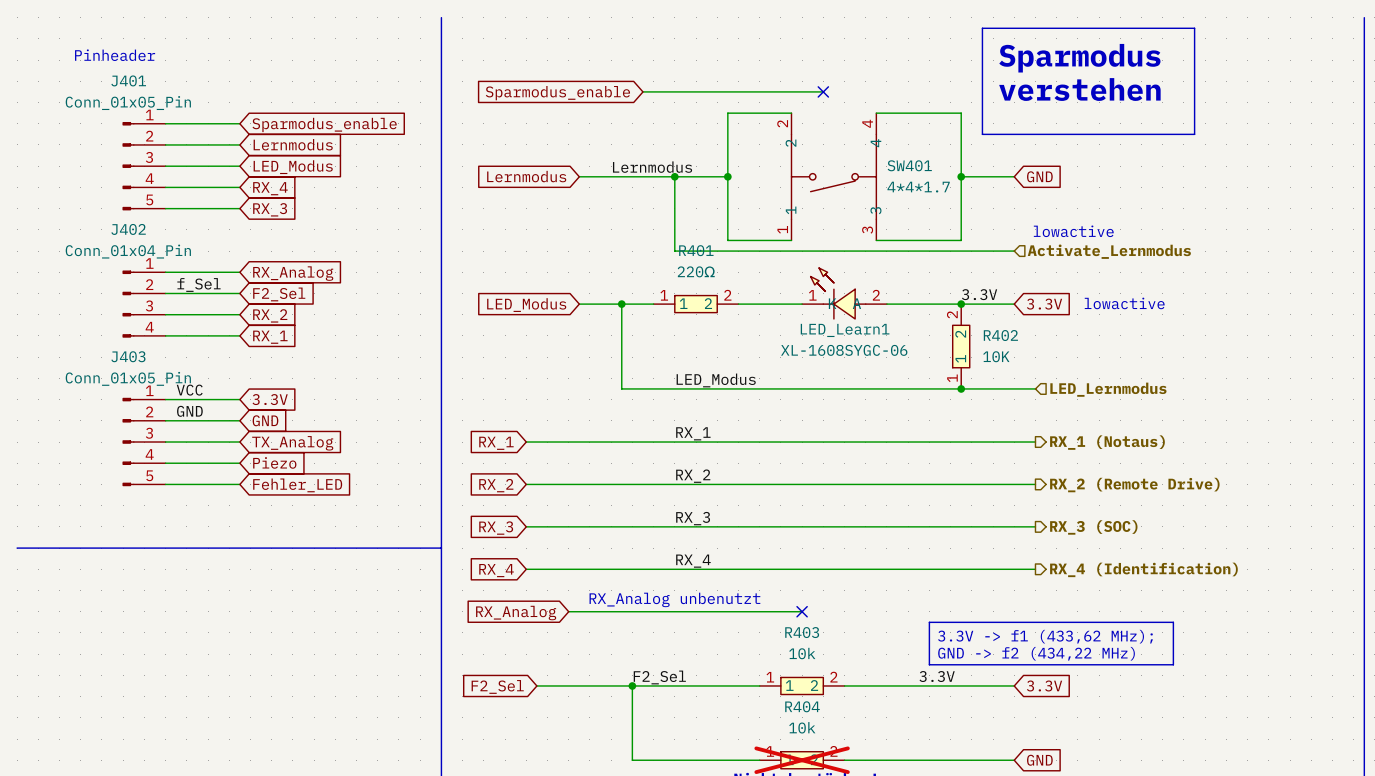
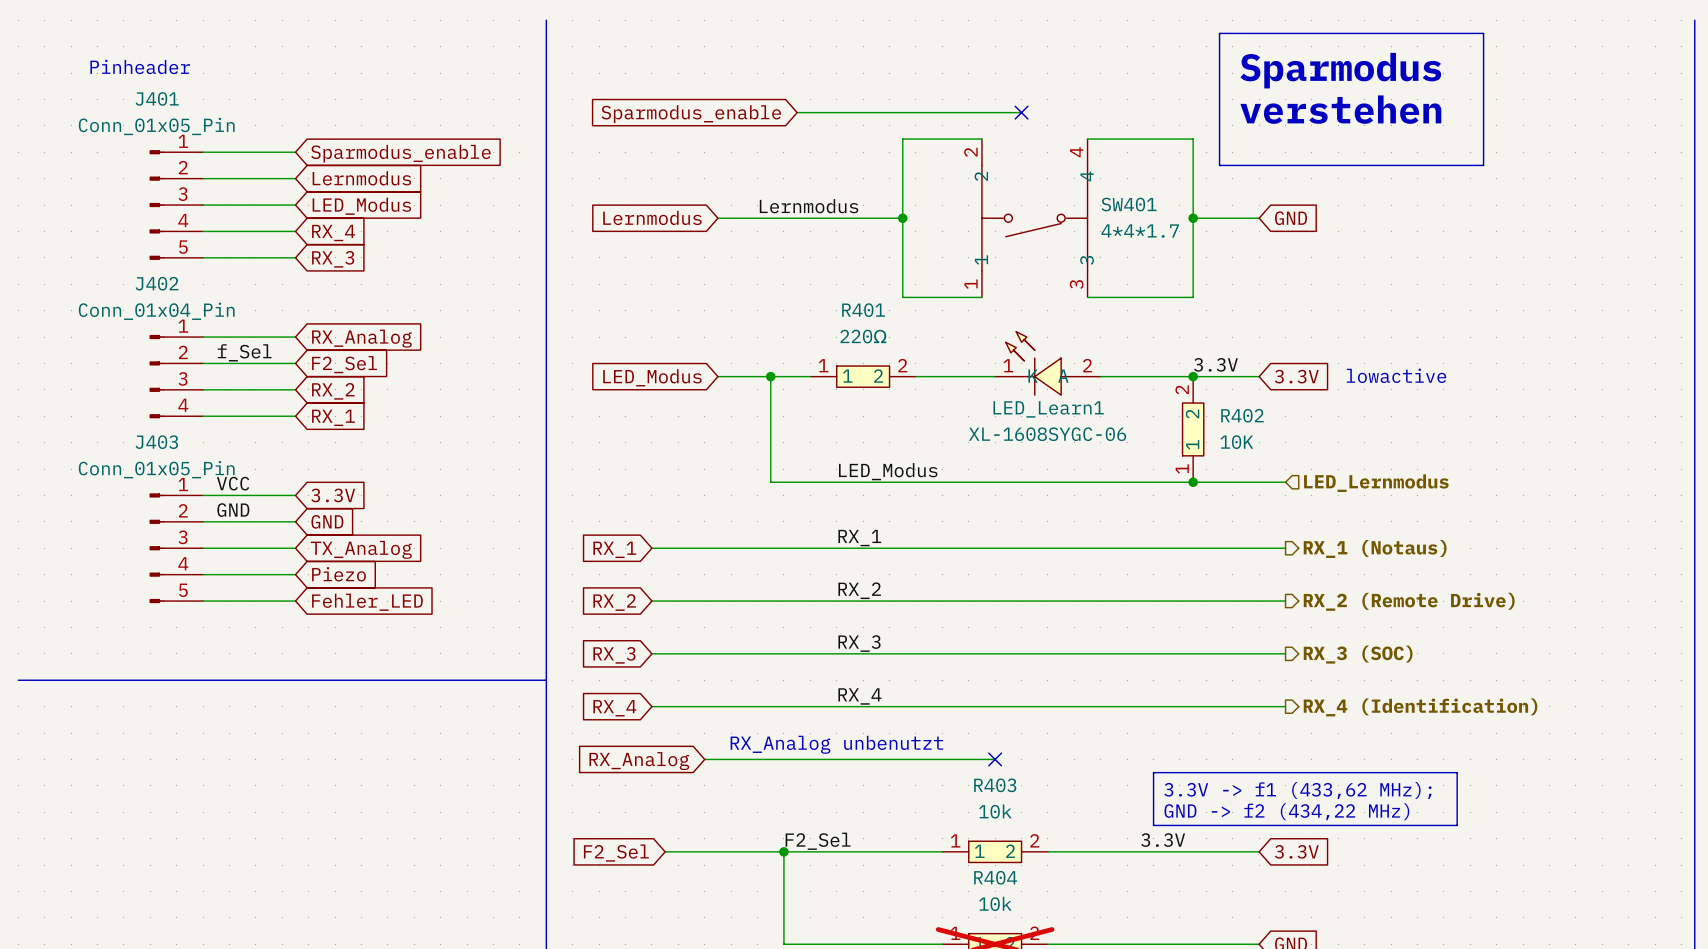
wire: (674, 176) (674, 251) (1014, 251) -> none
junction: (674, 176) -> none
text: lowactive (1073, 231) -> none
hierarchical label: Activate_Lernmodus (1109, 251) -> none

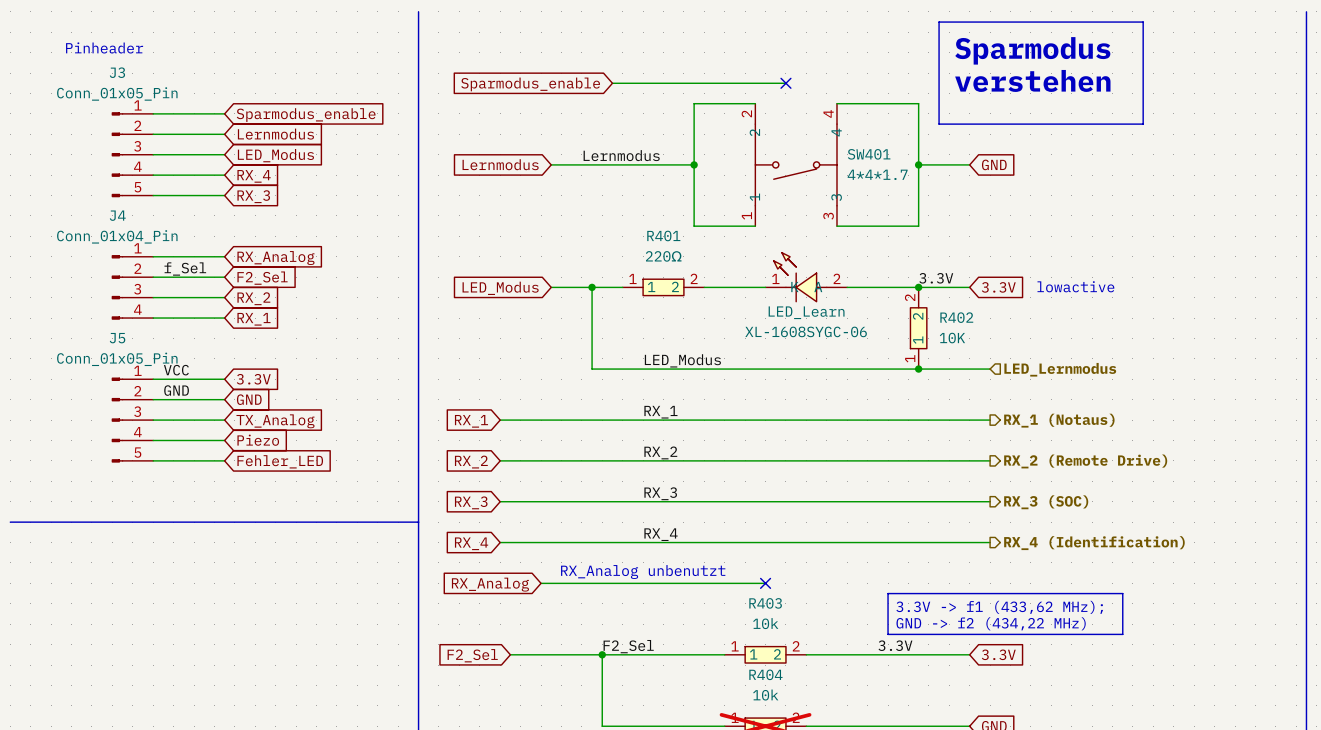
J401 name: J401 (157, 98) -> J3 (117, 72)
J402 name: J402 (157, 283) -> J4 (117, 215)
LED_Learn1 name: LED_Learn1 (1048, 409) -> LED_Learn (806, 312)
J403 name: J403 (156, 442) -> J5 (117, 338)

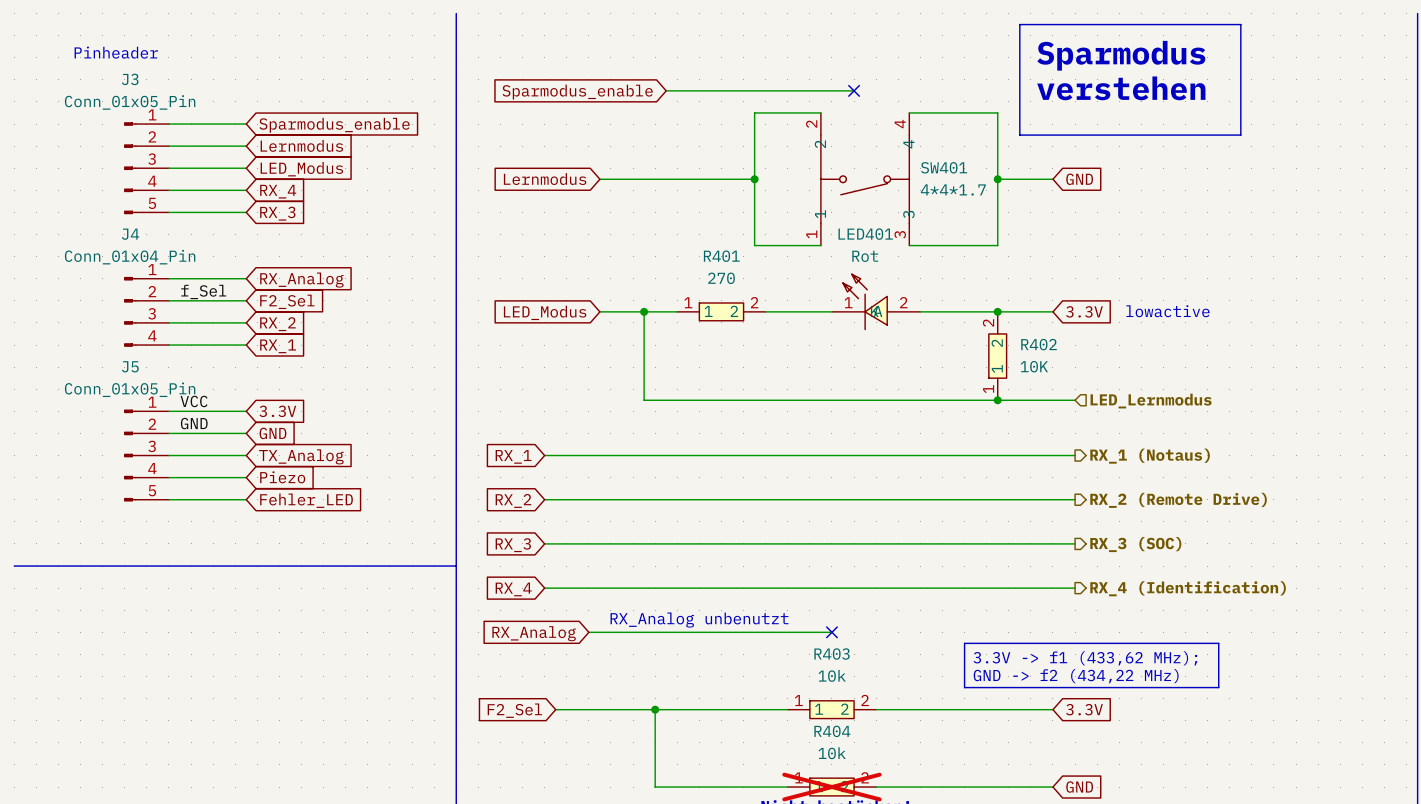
label: Lernmodus (621, 155) -> none
R401 value: 220Ω (663, 256) -> 270 (721, 278)
LED_Learn: XL-1608SYGC-06 (806, 277) -> none
LED401: none -> Rot (876, 301)
label: 3.3V (936, 278) -> none
label: LED_Modus (682, 360) -> none
label: RX_1 (660, 412) -> none
label: RX_2 (660, 452) -> none
label: RX_3 (660, 493) -> none
label: RX_4 (661, 534) -> none
label: 3.3V (895, 645) -> none
label: F2_Sel (628, 646) -> none

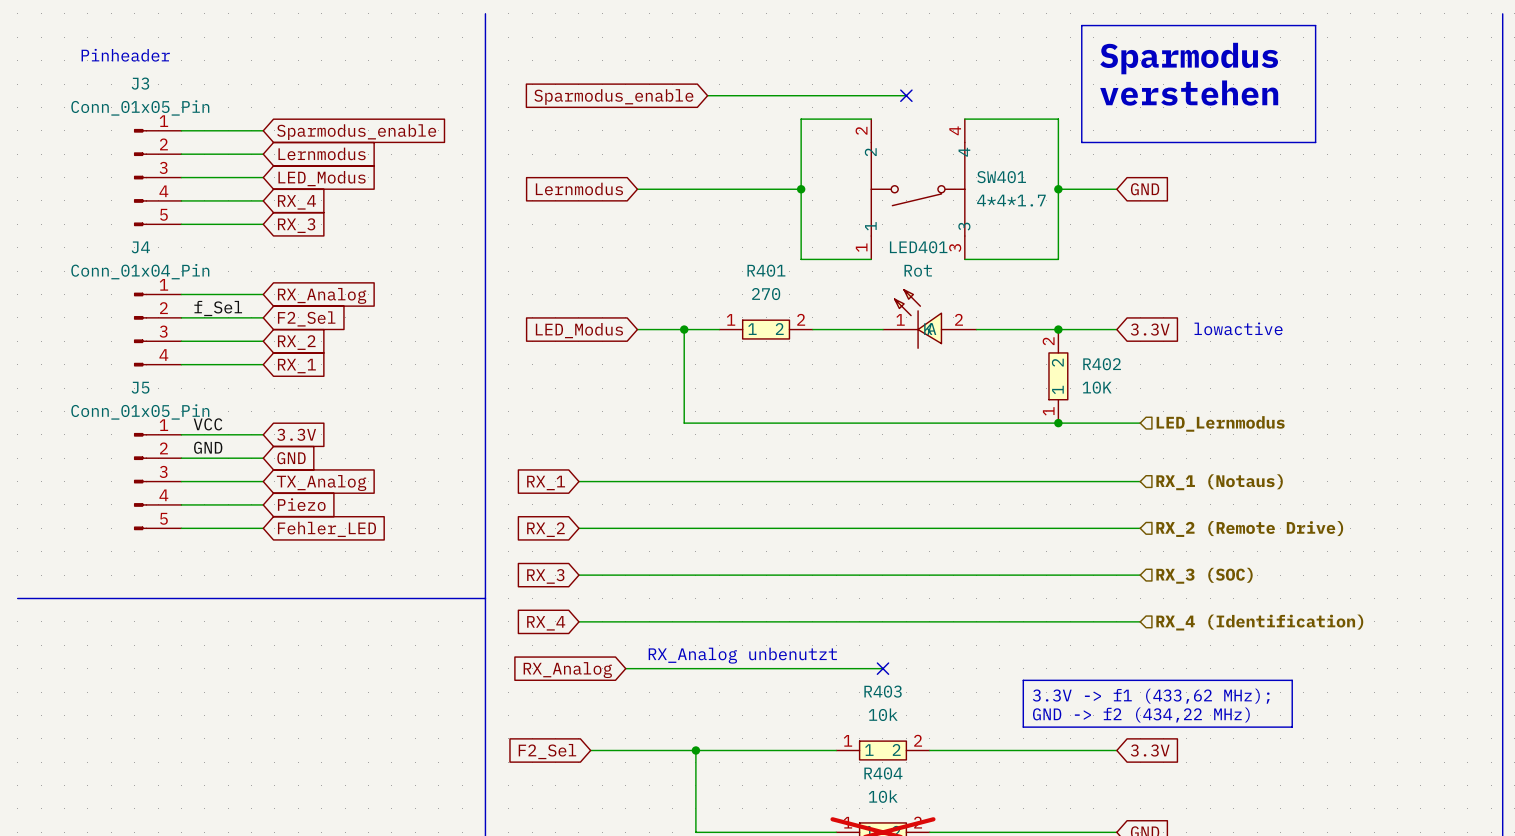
hierarchical label shape: output (1150, 456) -> input (1219, 482)
hierarchical label shape: output (1178, 500) -> input (1249, 528)
hierarchical label shape: output (1135, 544) -> input (1204, 575)
hierarchical label shape: output (1188, 588) -> input (1259, 622)

